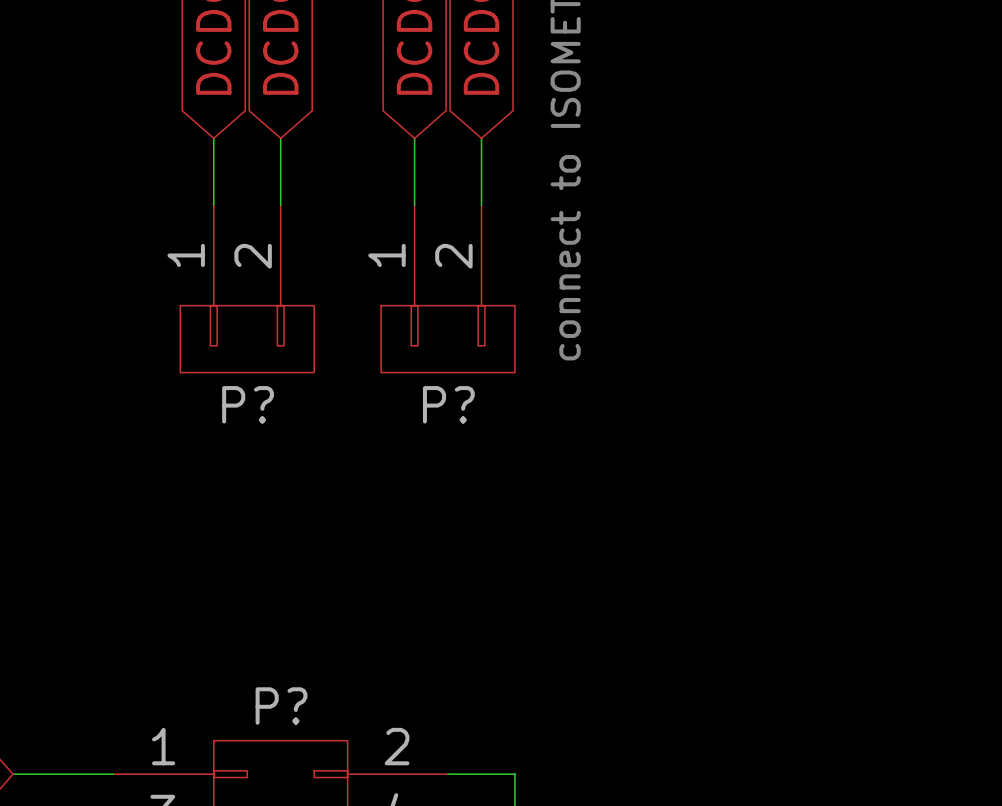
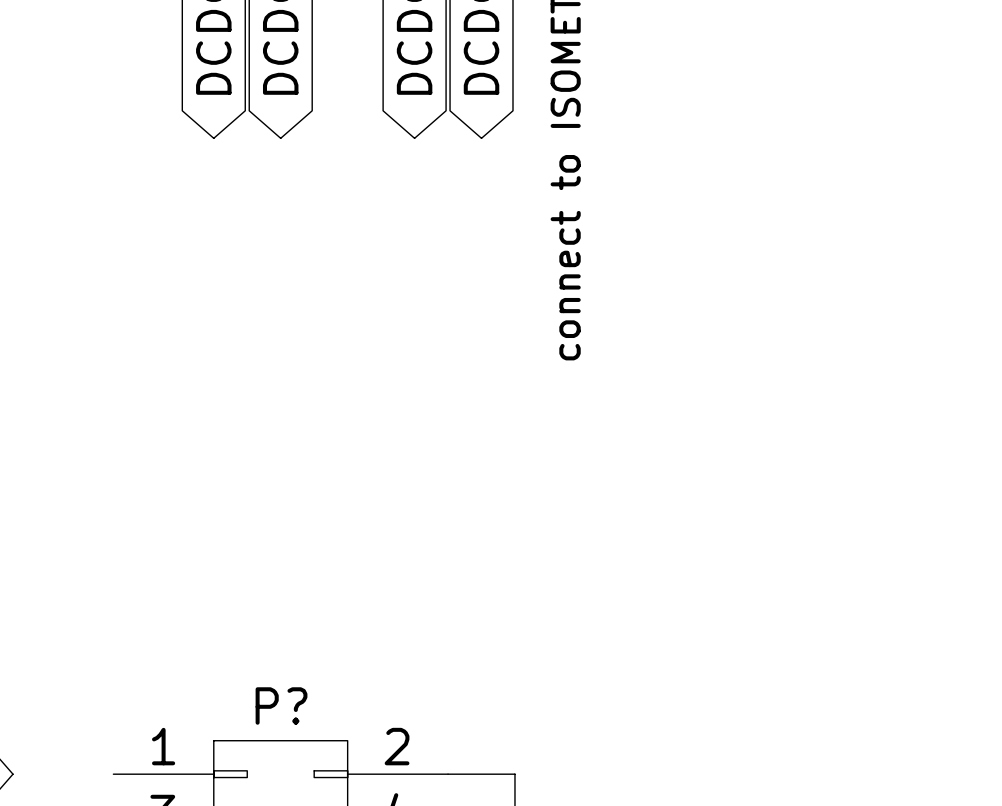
wire: (213, 138) (213, 205) -> none
wire: (280, 138) (280, 205) -> none
wire: (414, 138) (414, 205) -> none
wire: (481, 138) (481, 205) -> none
P?: (247, 288) -> none
P?: (448, 288) -> none
wire: (12, 774) (113, 774) -> none

